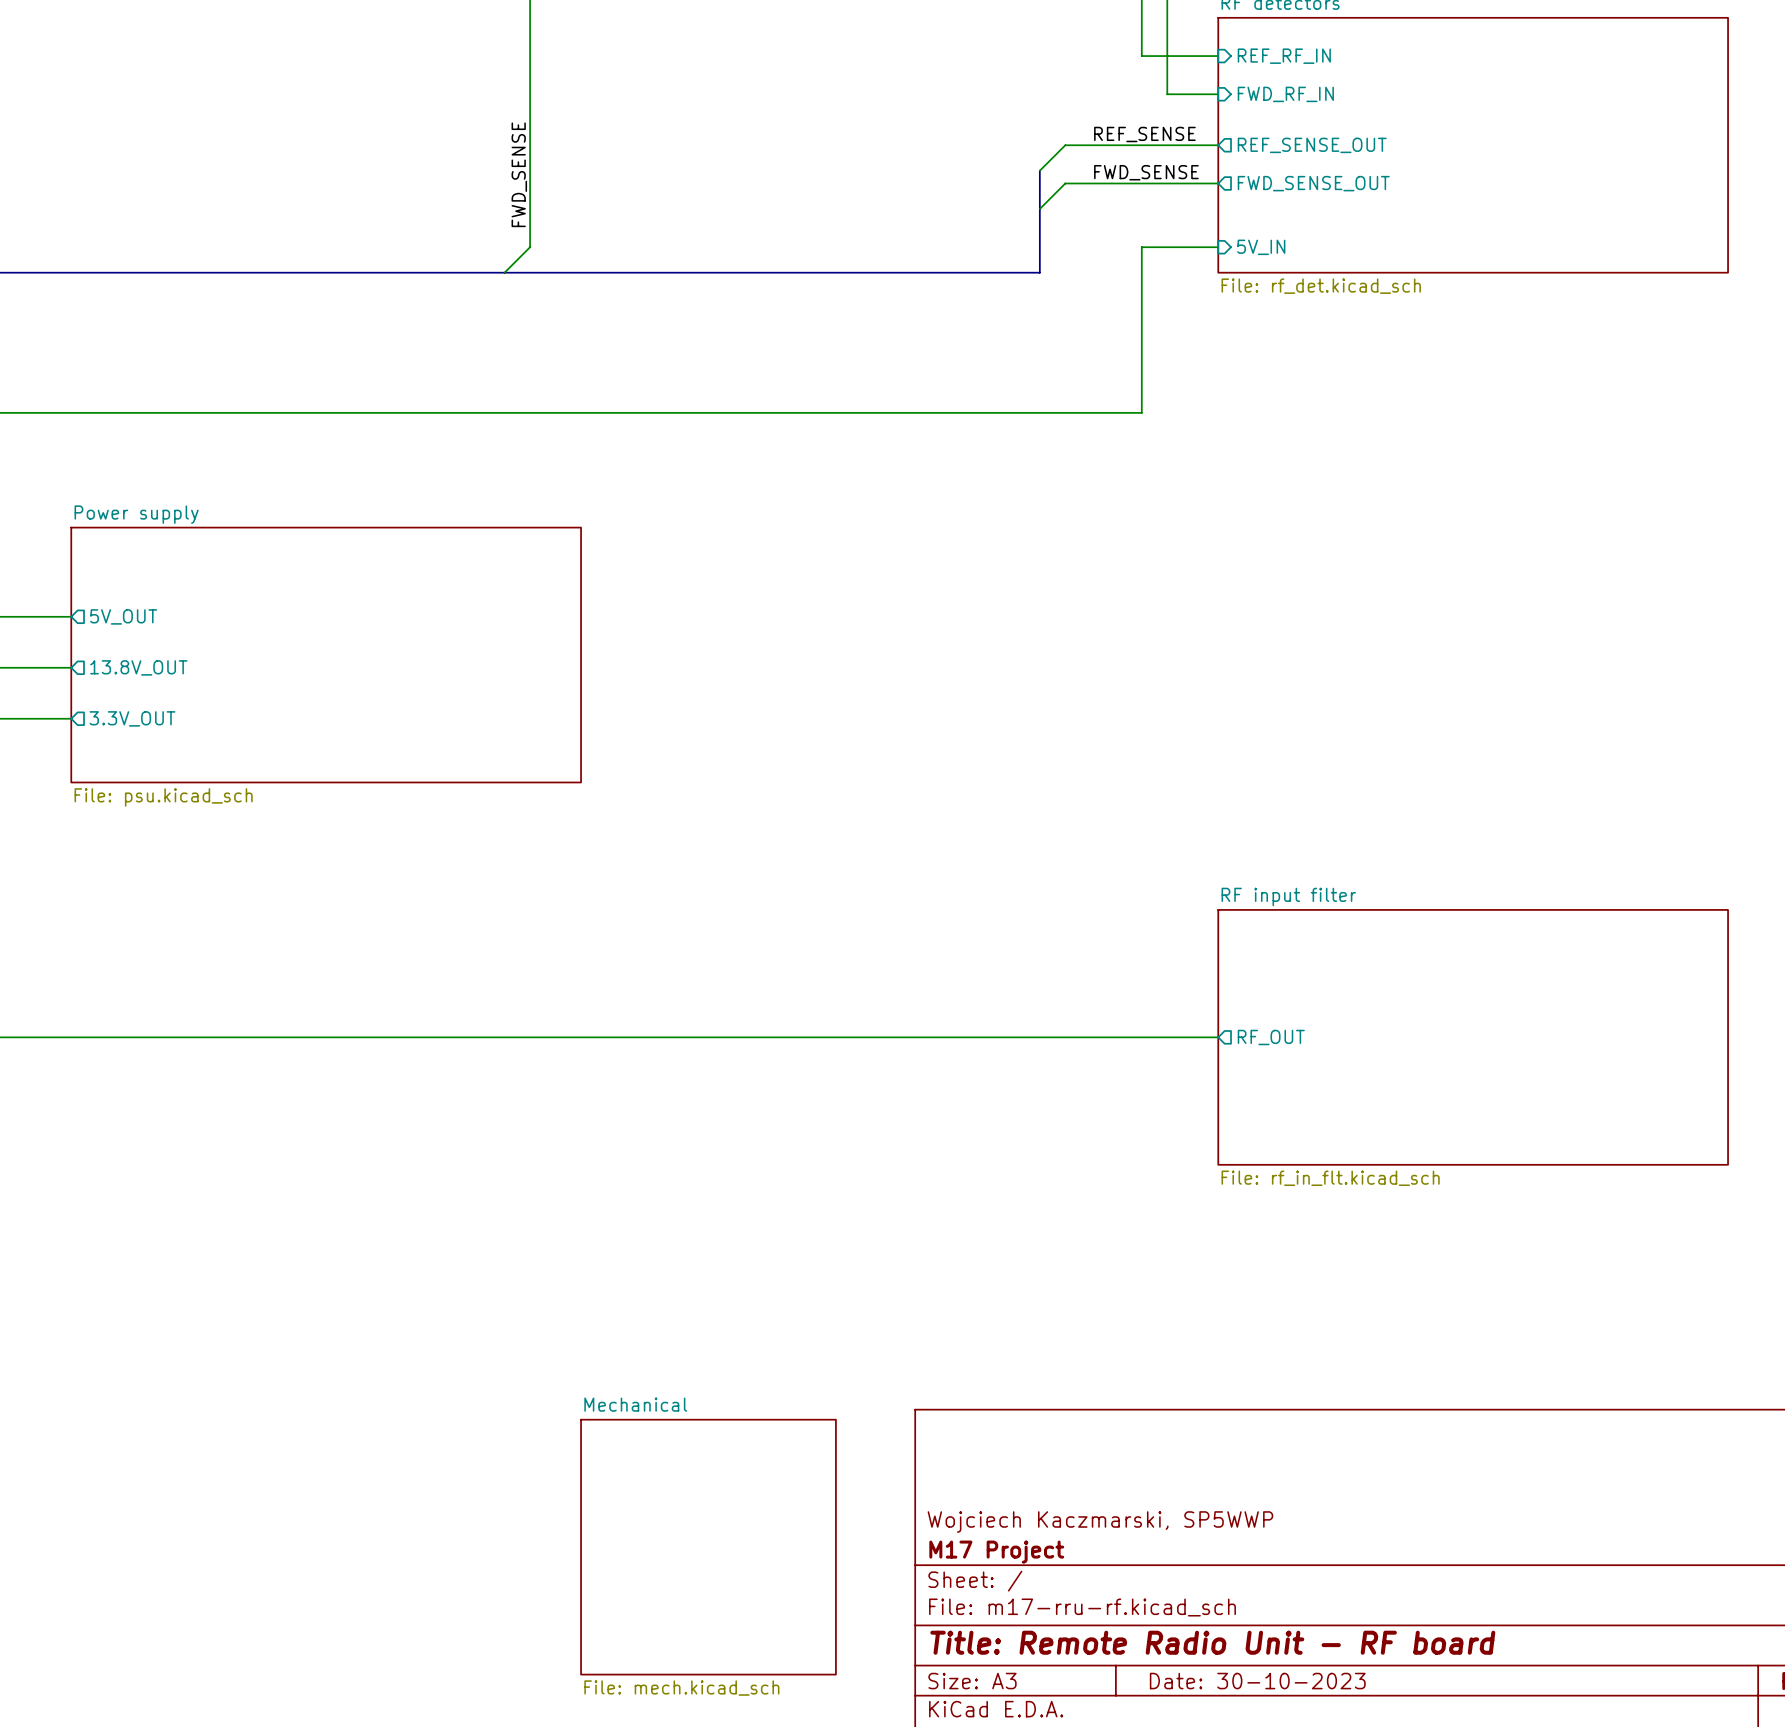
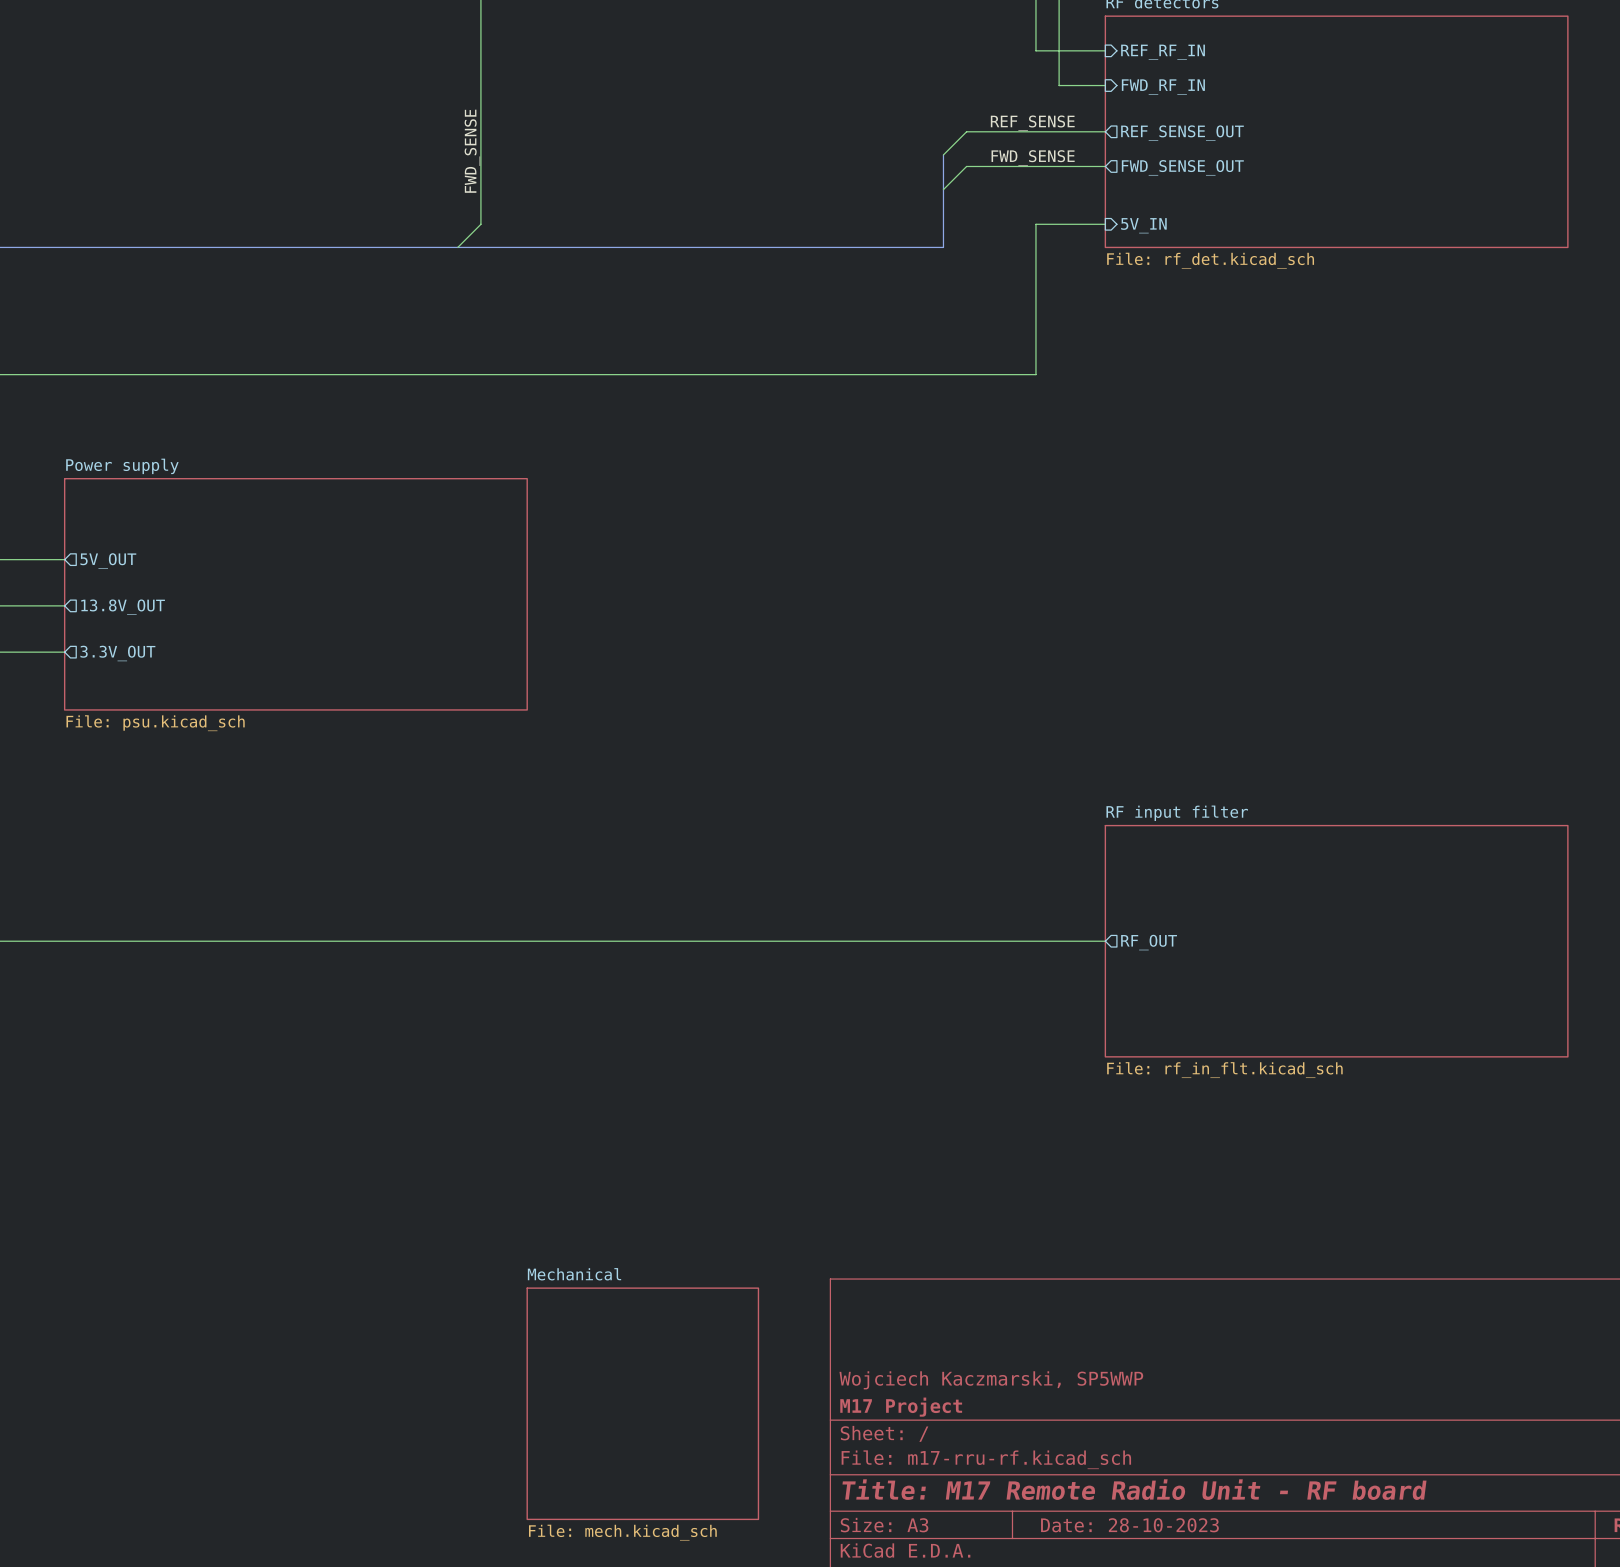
title block: Title: Remote Radio Unit - RF board (1212, 1642) -> Title: M17 Remote Radio Unit - RF board (1134, 1489)
title block: Date: 30-10-2023 (1257, 1681) -> Date: 28-10-2023 (1129, 1525)

